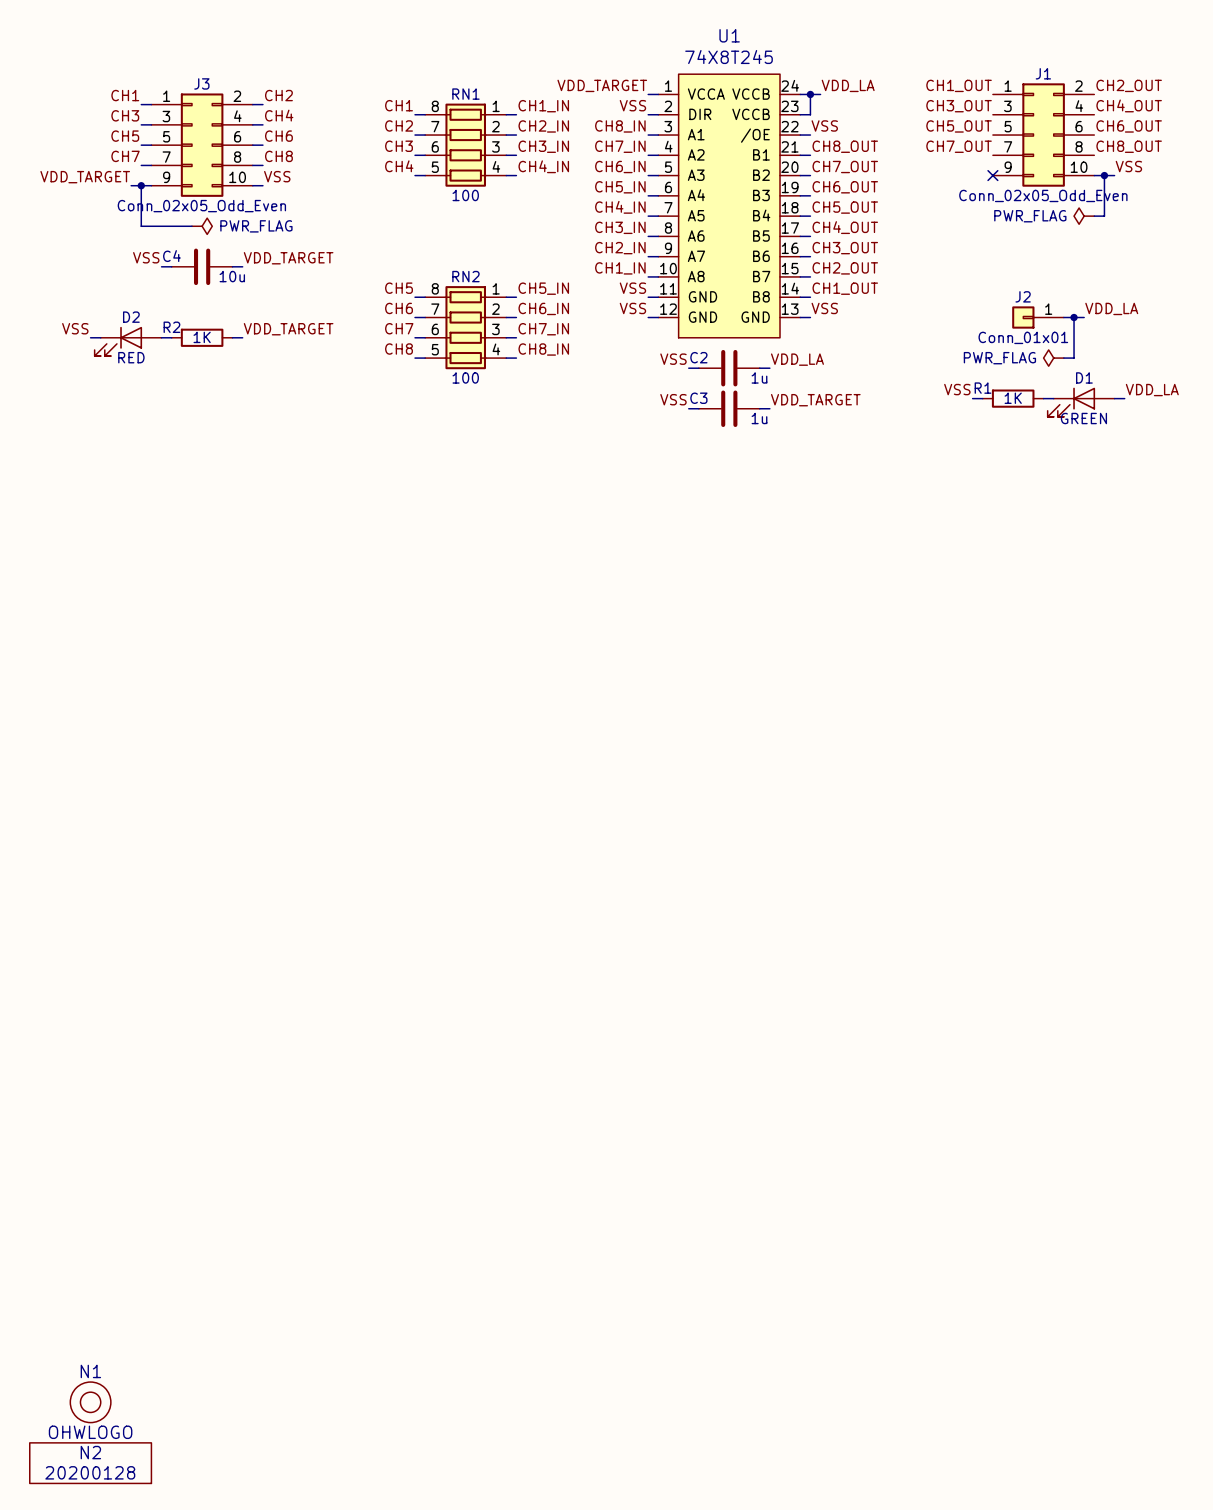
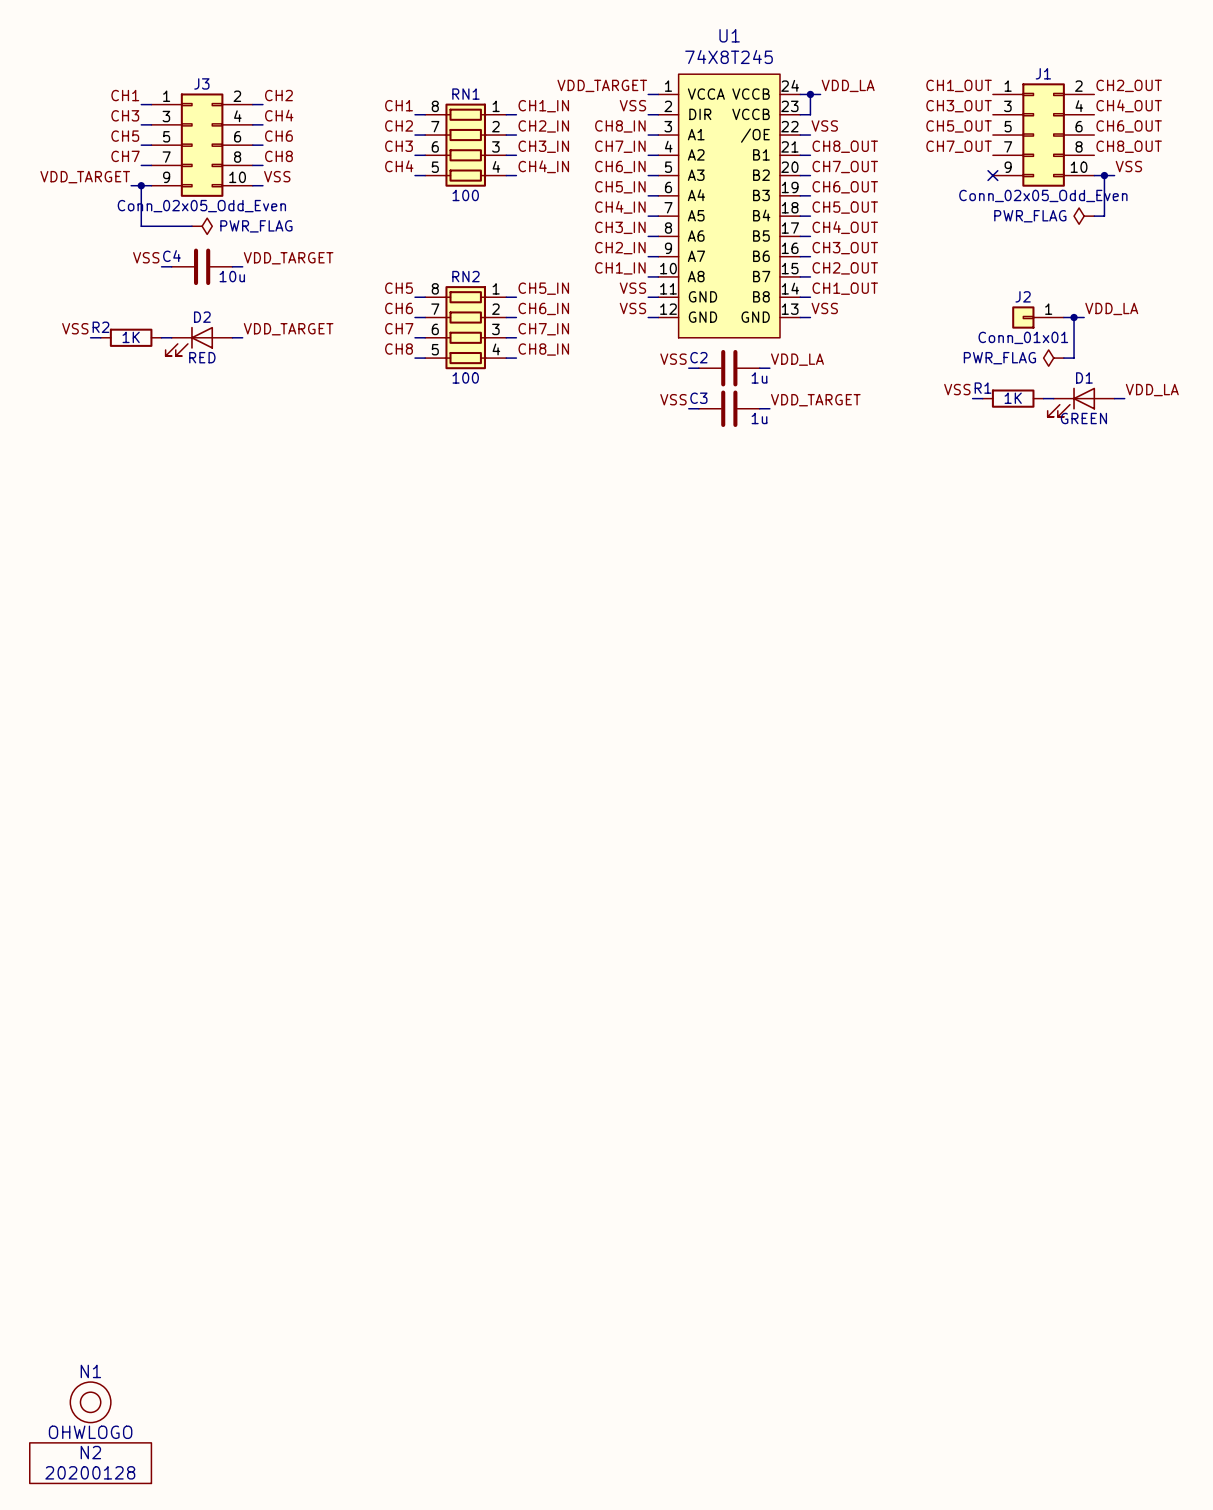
R2 position: (202, 337) -> (131, 337)
D2 position: (128, 341) -> (199, 341)

